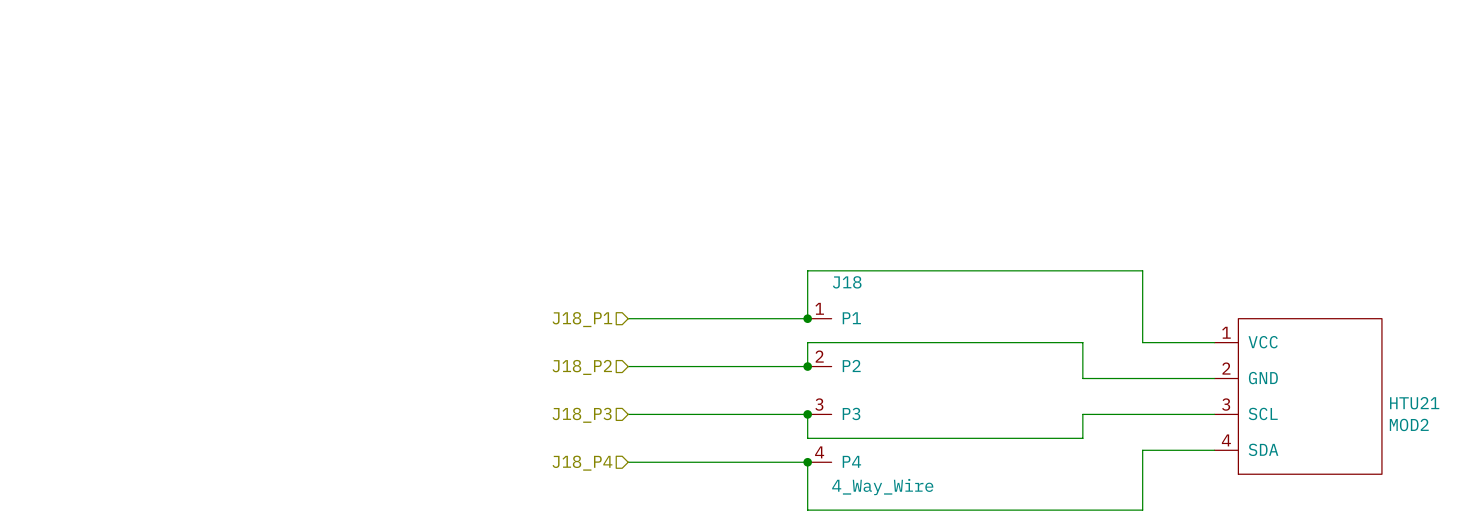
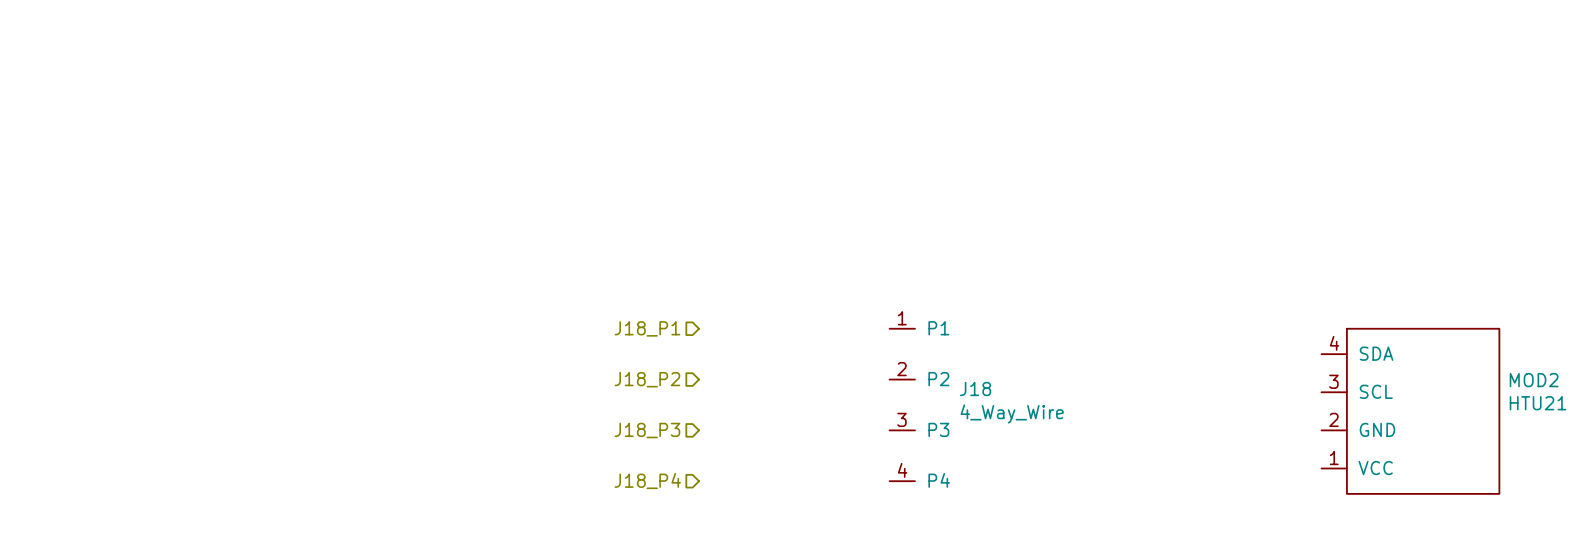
J18 name position: J18 (847, 282) -> J18 (975, 389)
wire: (628, 318) (807, 318) (807, 270) (1142, 270) (1142, 342) (1214, 342) -> none
junction: (807, 318) -> none
wire: (628, 366) (807, 366) (807, 342) (1082, 342) (1082, 378) (1214, 378) -> none
junction: (807, 366) -> none
MOD2 flip: as is (1310, 396) -> up-down (1423, 411)
wire: (628, 414) (807, 414) (807, 438) (1082, 438) (1082, 414) (1214, 414) -> none
junction: (807, 414) -> none
wire: (1214, 450) (1142, 450) (1142, 510) (807, 510) (807, 462) (628, 462) -> none
junction: (807, 462) -> none
J18 value position: 4_Way_Wire (882, 487) -> 4_Way_Wire (1012, 413)

